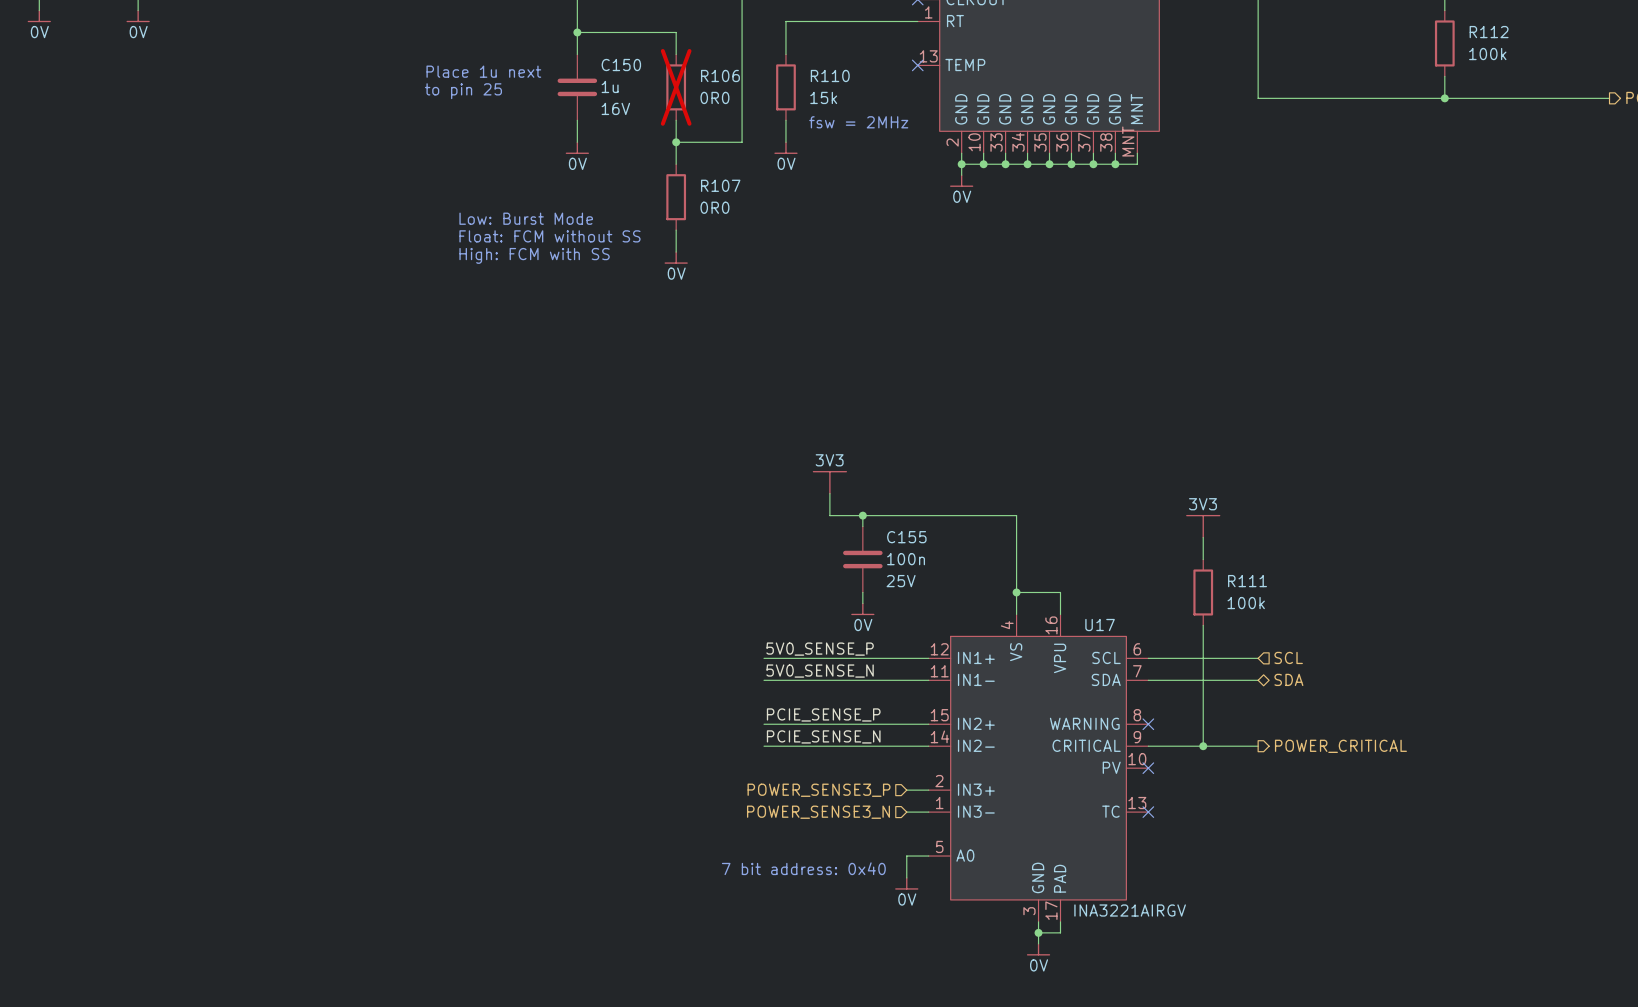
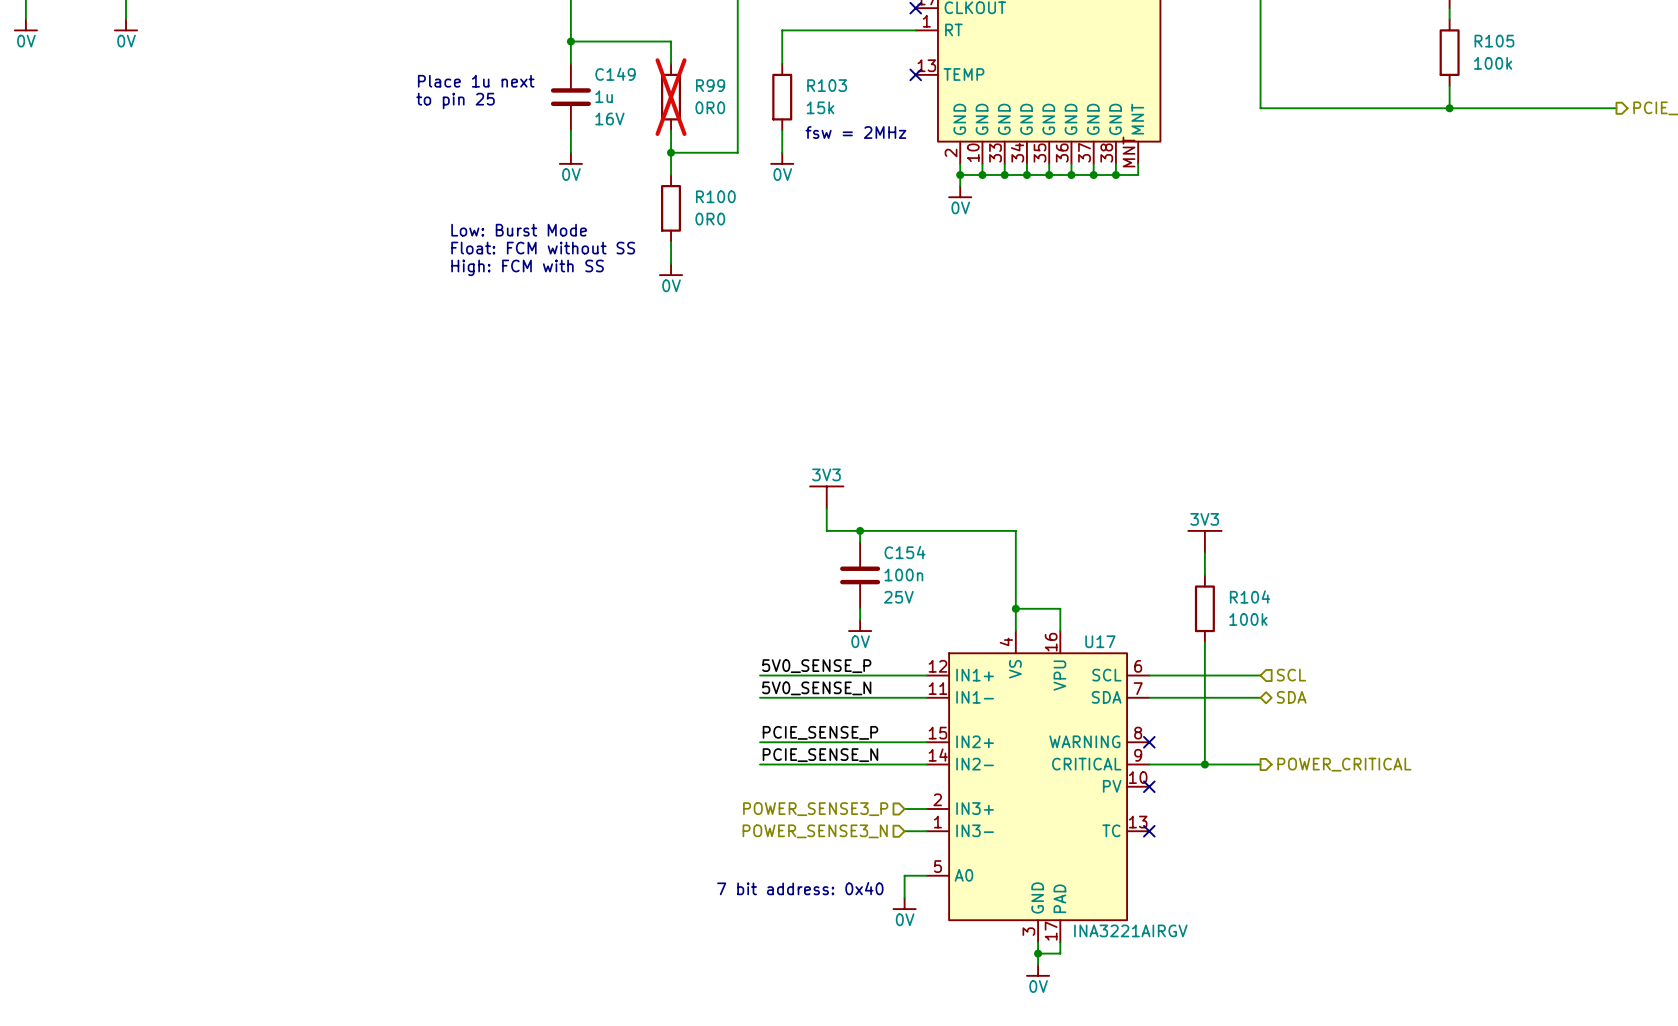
R112 name: R112 (1489, 32) -> R105 (1494, 41)
C150 name: C150 (621, 65) -> C149 (615, 74)
R106 name: R106 (720, 75) -> R99 (710, 85)
R110 name: R110 (830, 75) -> R103 (827, 85)
R107 name: R107 (720, 185) -> R100 (715, 196)
C155 name: C155 (906, 537) -> C154 (904, 552)
R111 name: R111 (1247, 581) -> R104 (1250, 596)

